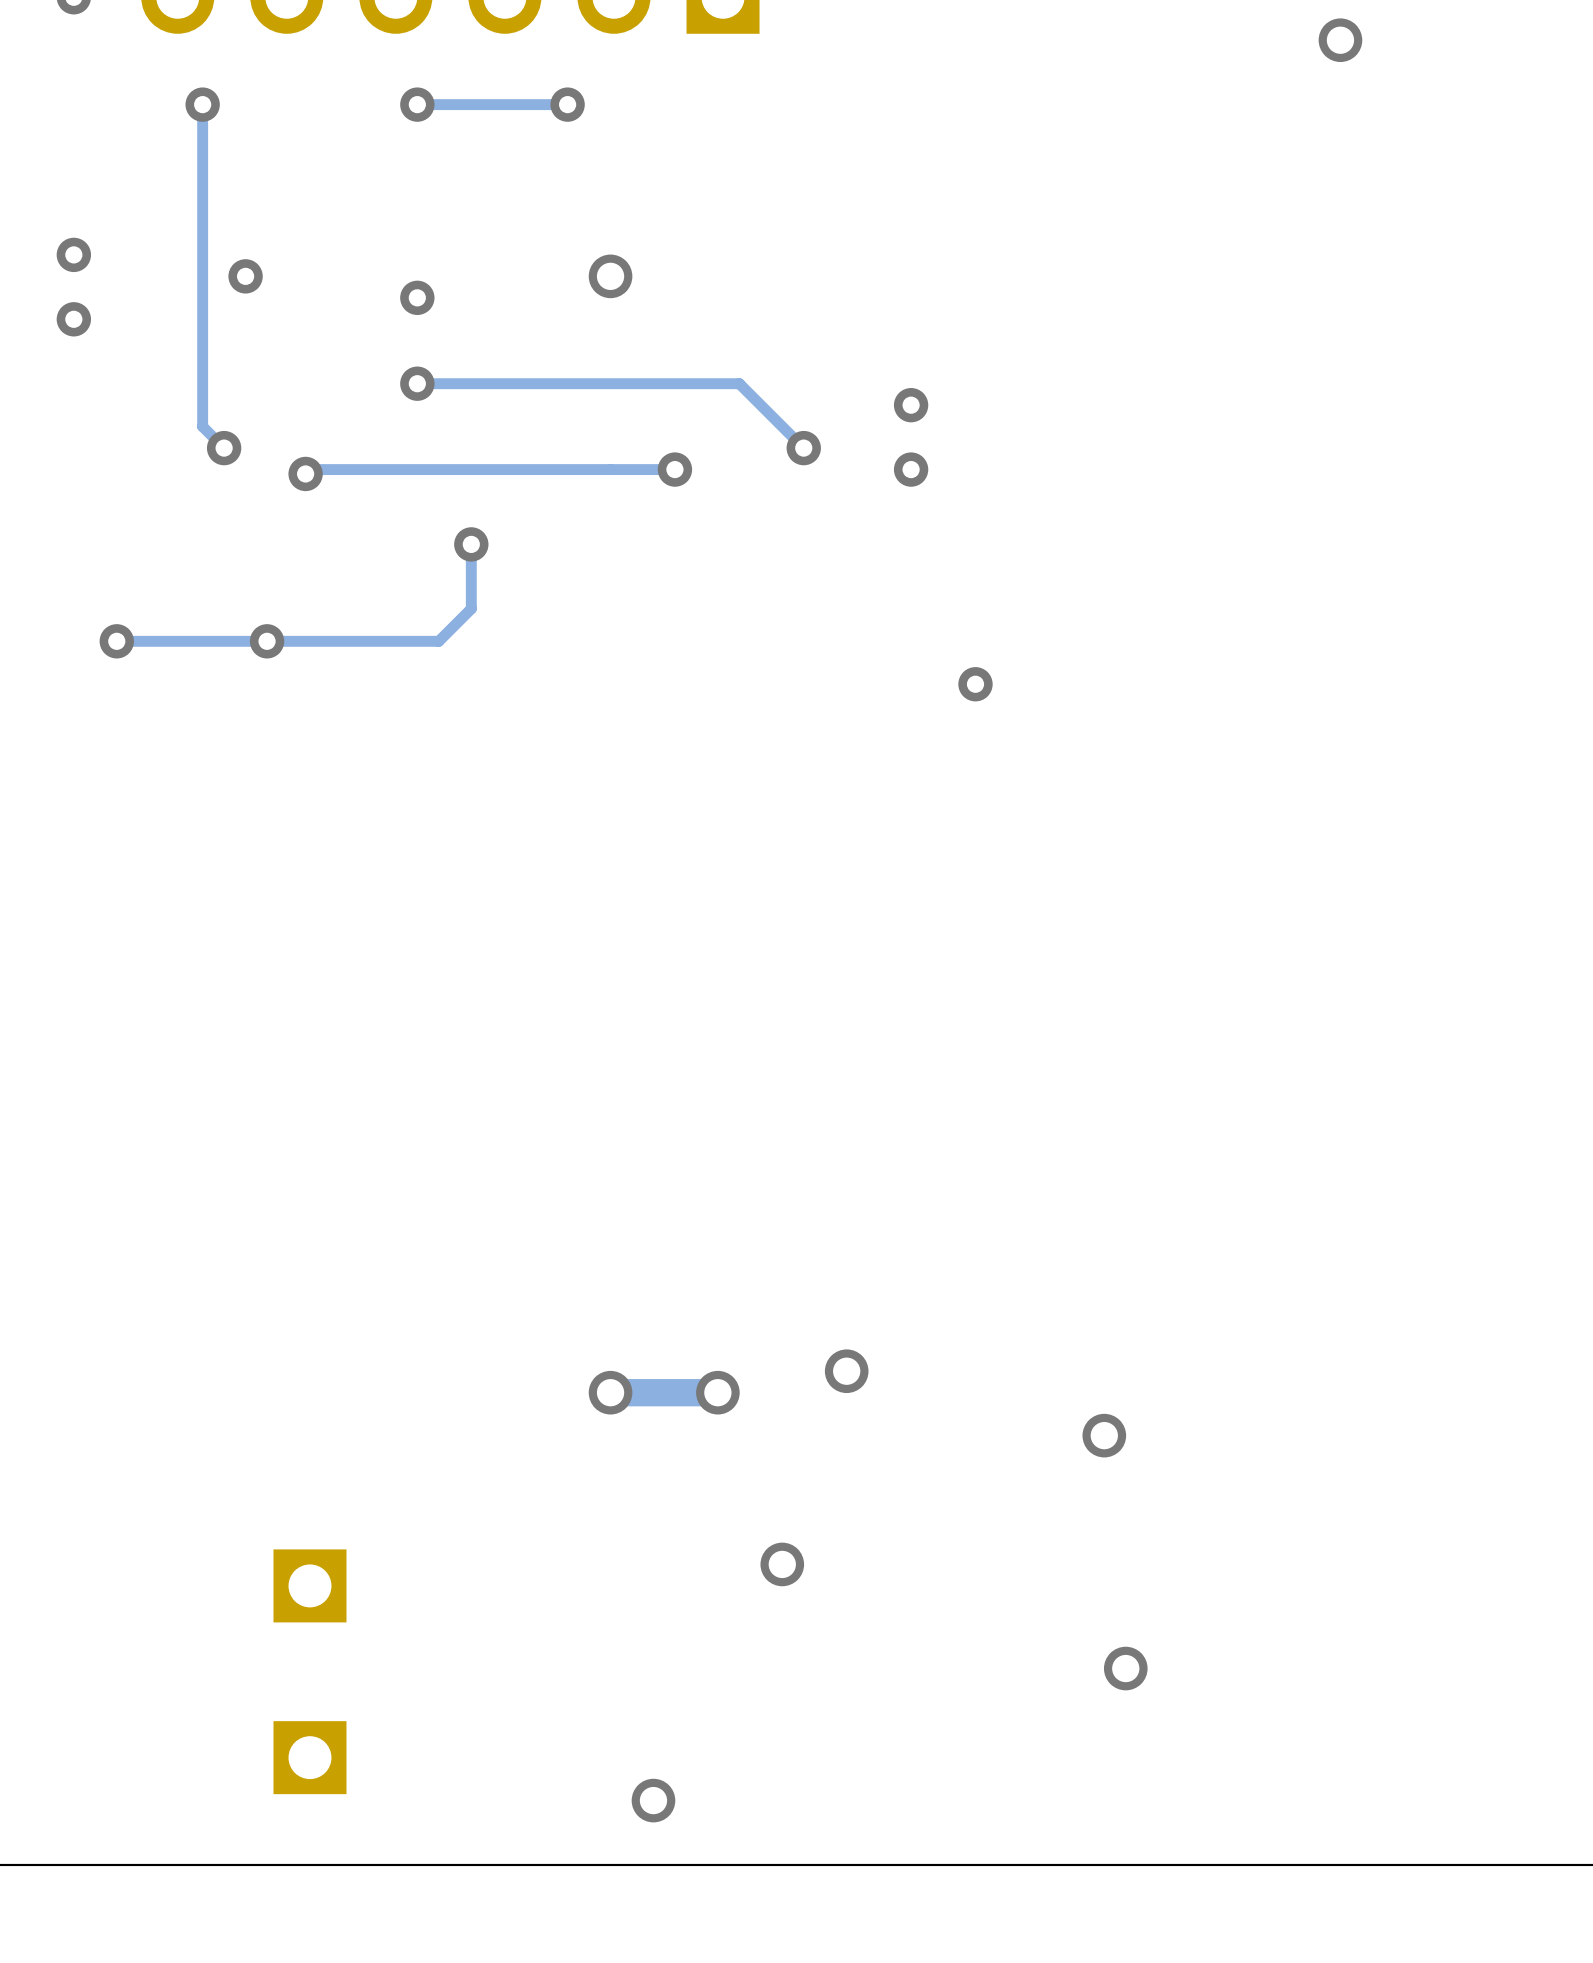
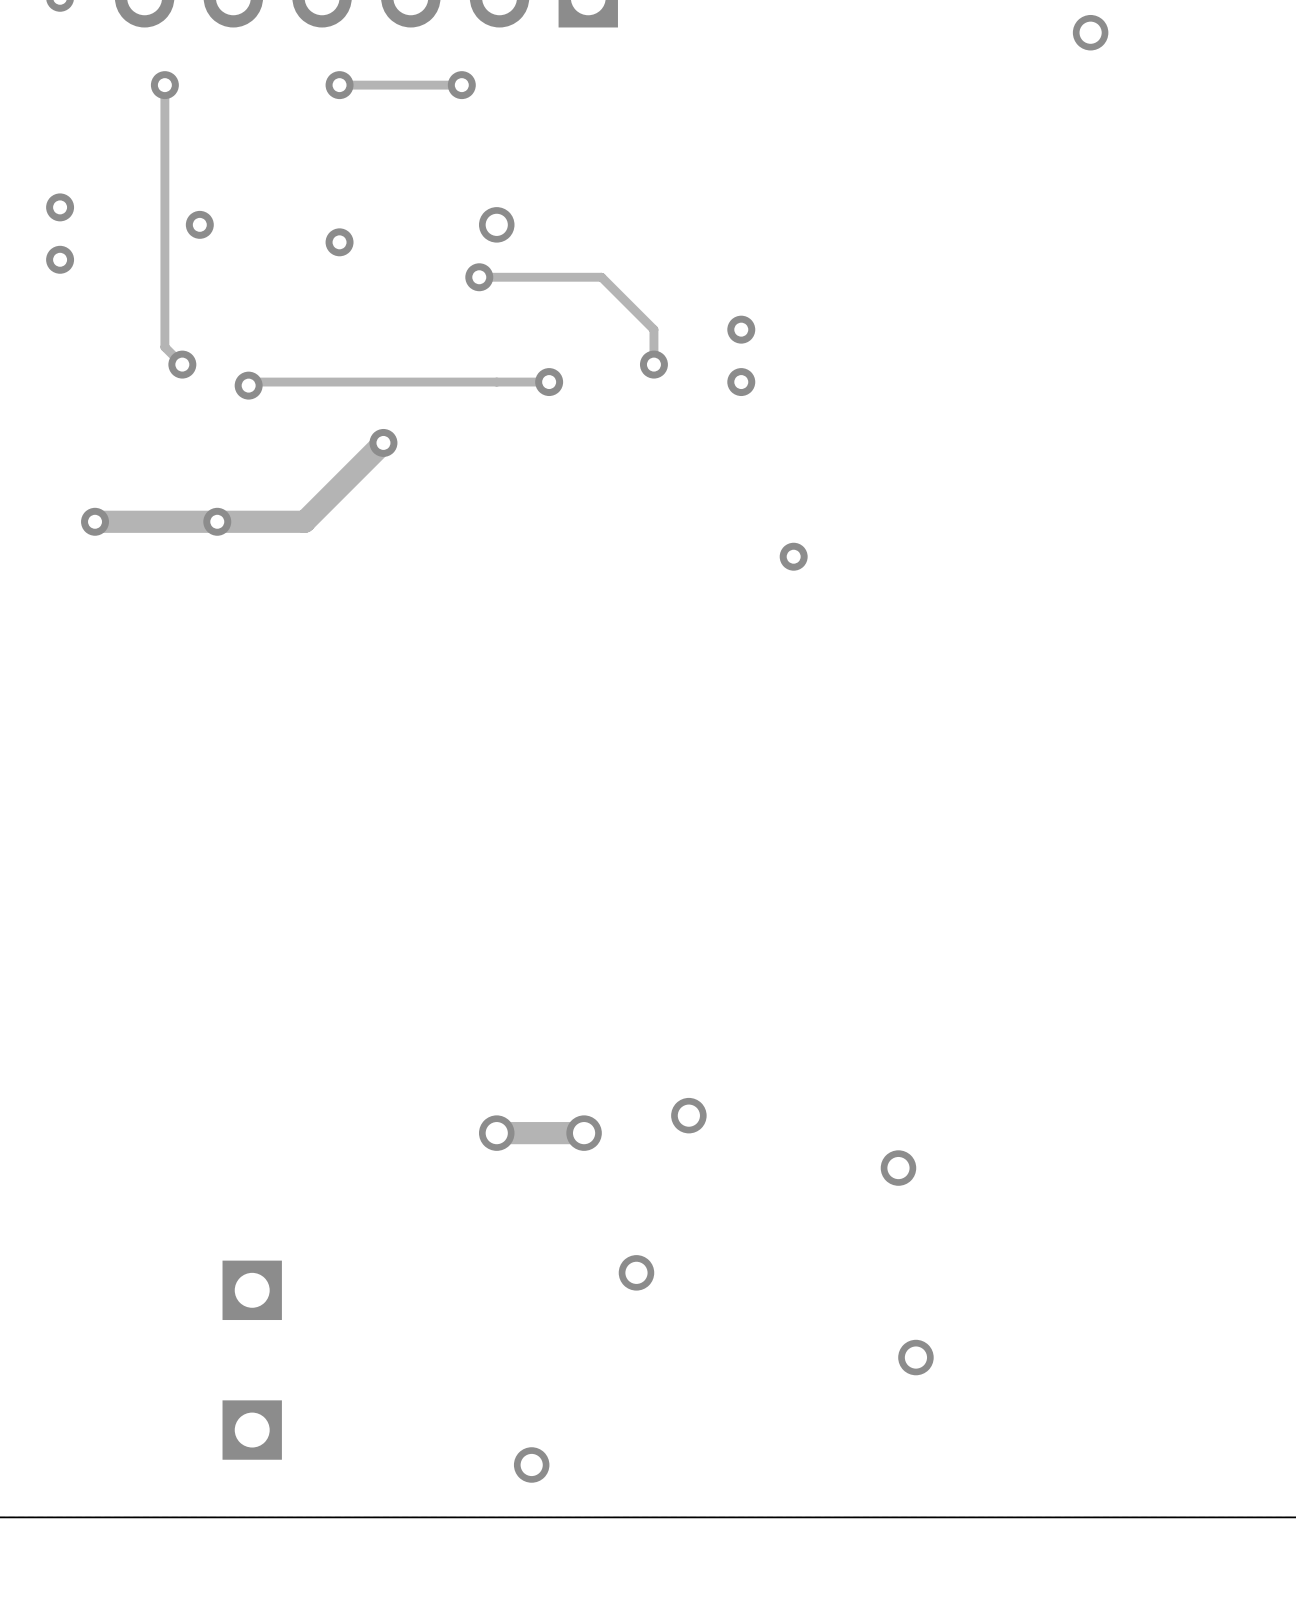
track: (417, 383) (739, 383) (803, 448) -> (479, 277) (601, 277) (653, 329) (653, 364)
via position: (417, 383) -> (479, 277)
track: (471, 544) (471, 608) (438, 641) (374, 641) -> (383, 442) (304, 521)
track width: thin (374, 641) (116, 641) -> thick (304, 521) (95, 521)

